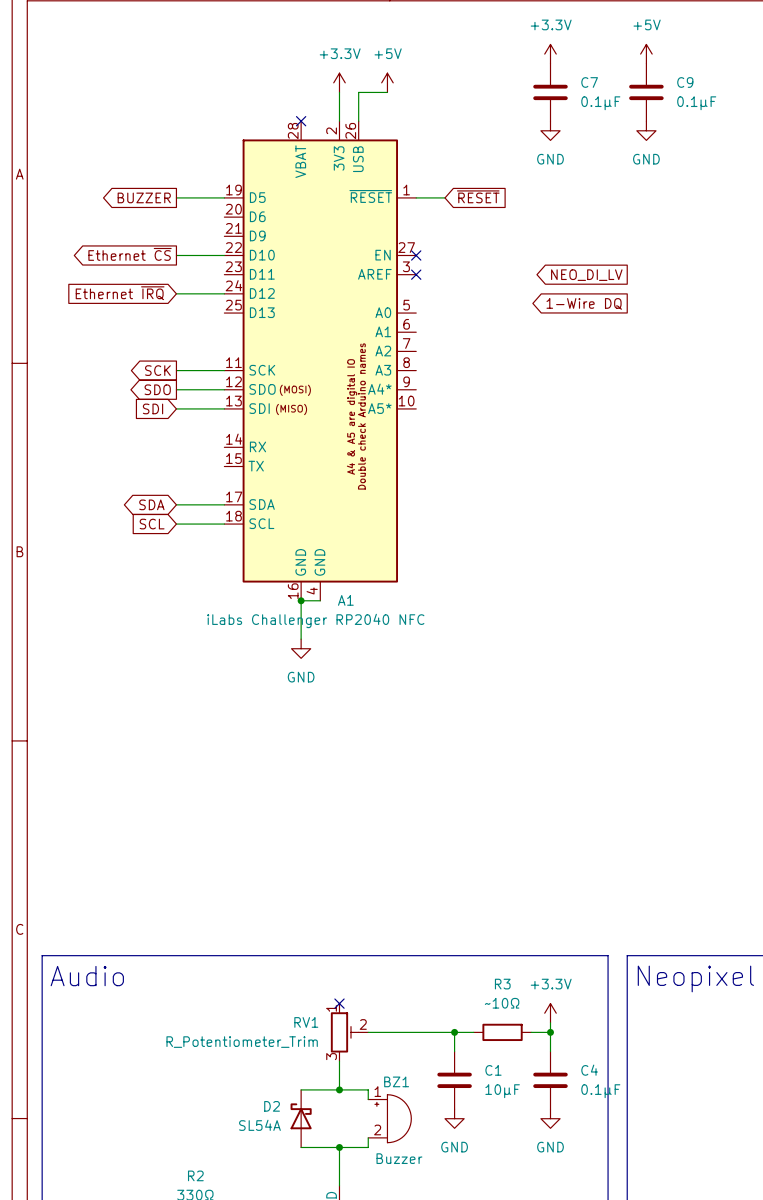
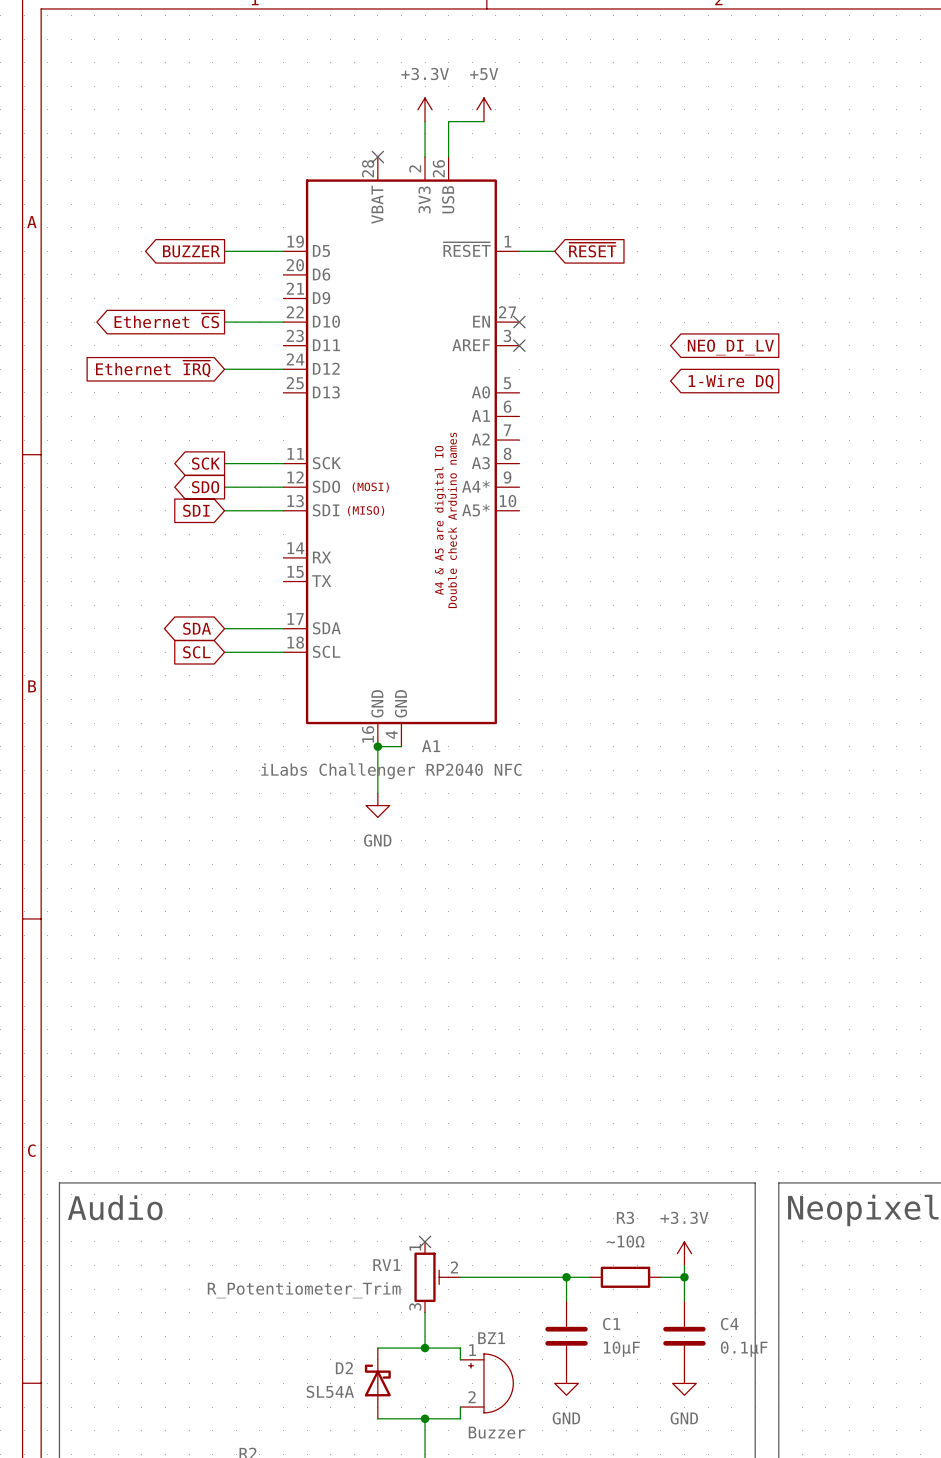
power symbol: +3.3V (550, 54) -> none
power symbol: +5V (646, 54) -> none
C7: 0.1µF (550, 92) -> none
C9: 0.1µF (646, 92) -> none
power symbol: GND (550, 130) -> none
power symbol: GND (646, 130) -> none

